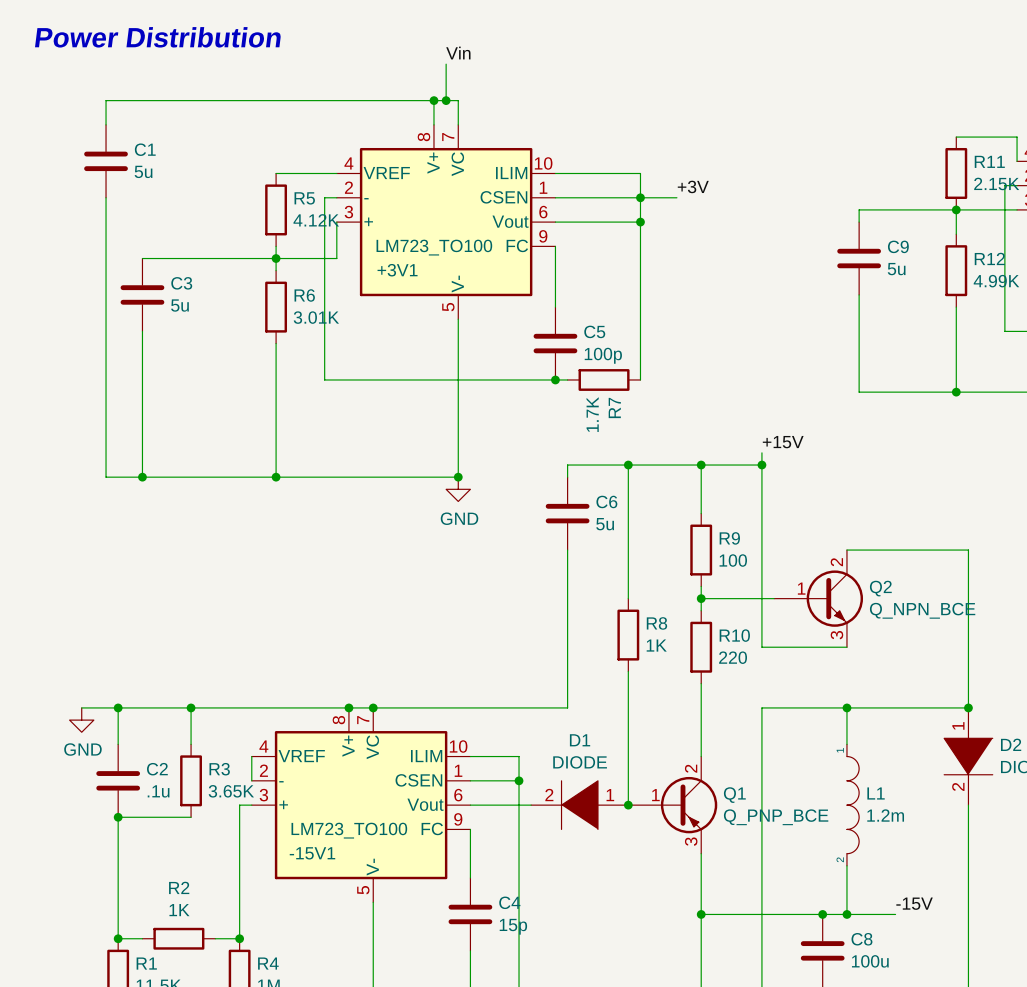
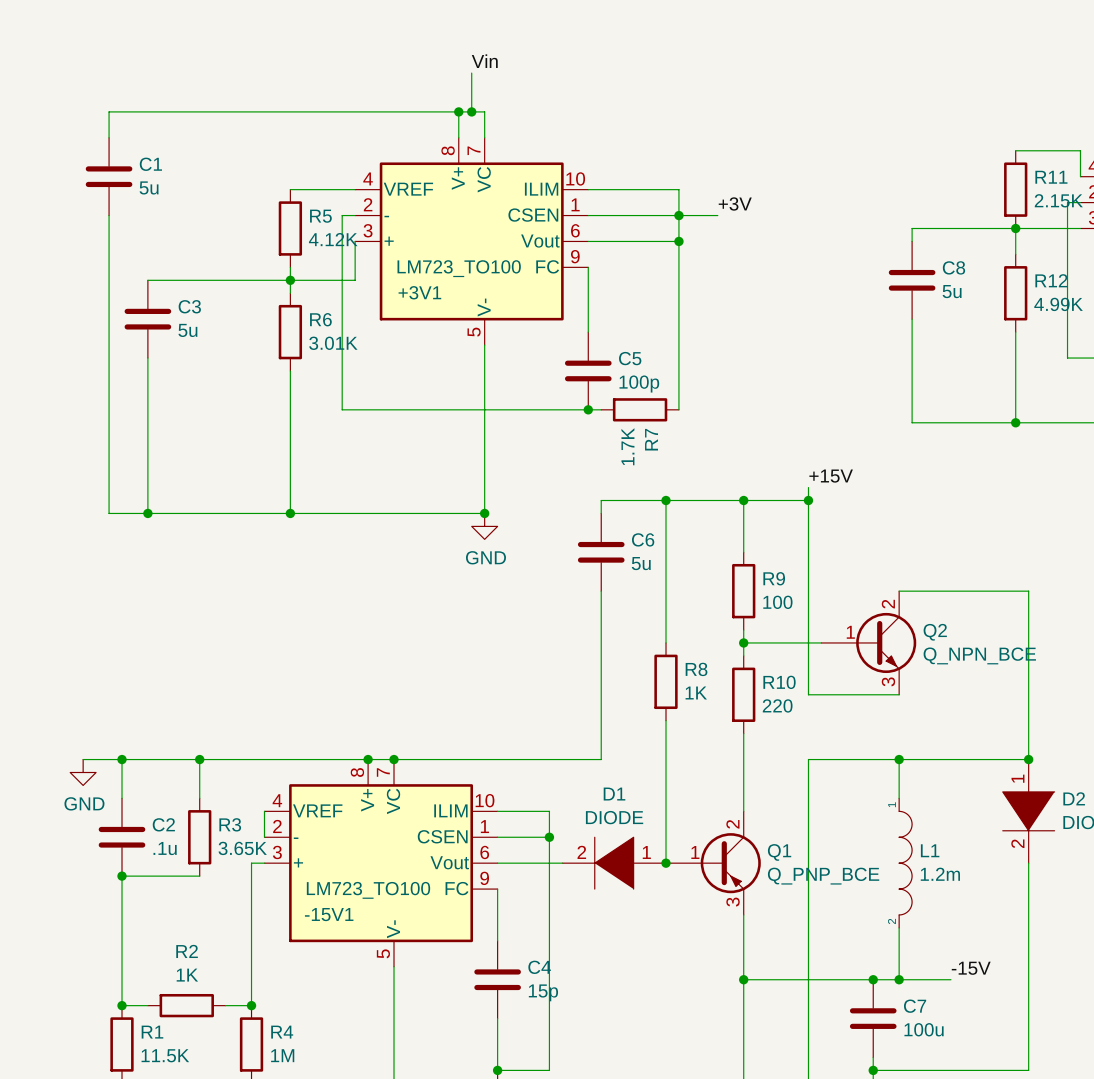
text: Power Distribution (157, 37) -> none
C9 name: C9 (898, 246) -> C8 (953, 267)
C8 name: C8 (861, 939) -> C7 (915, 1006)

